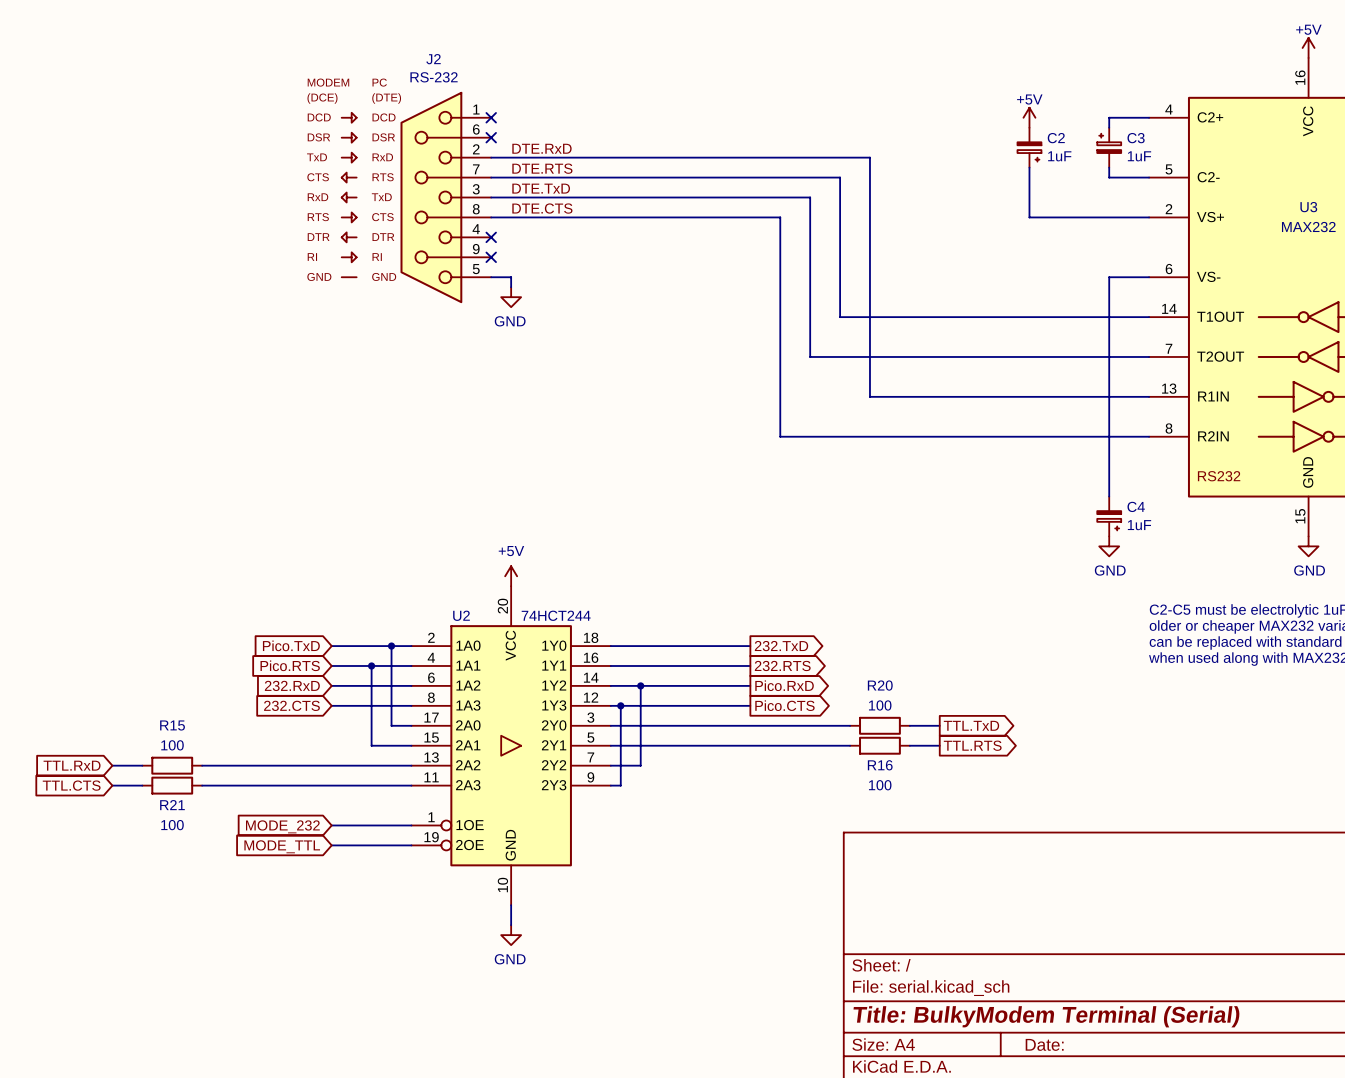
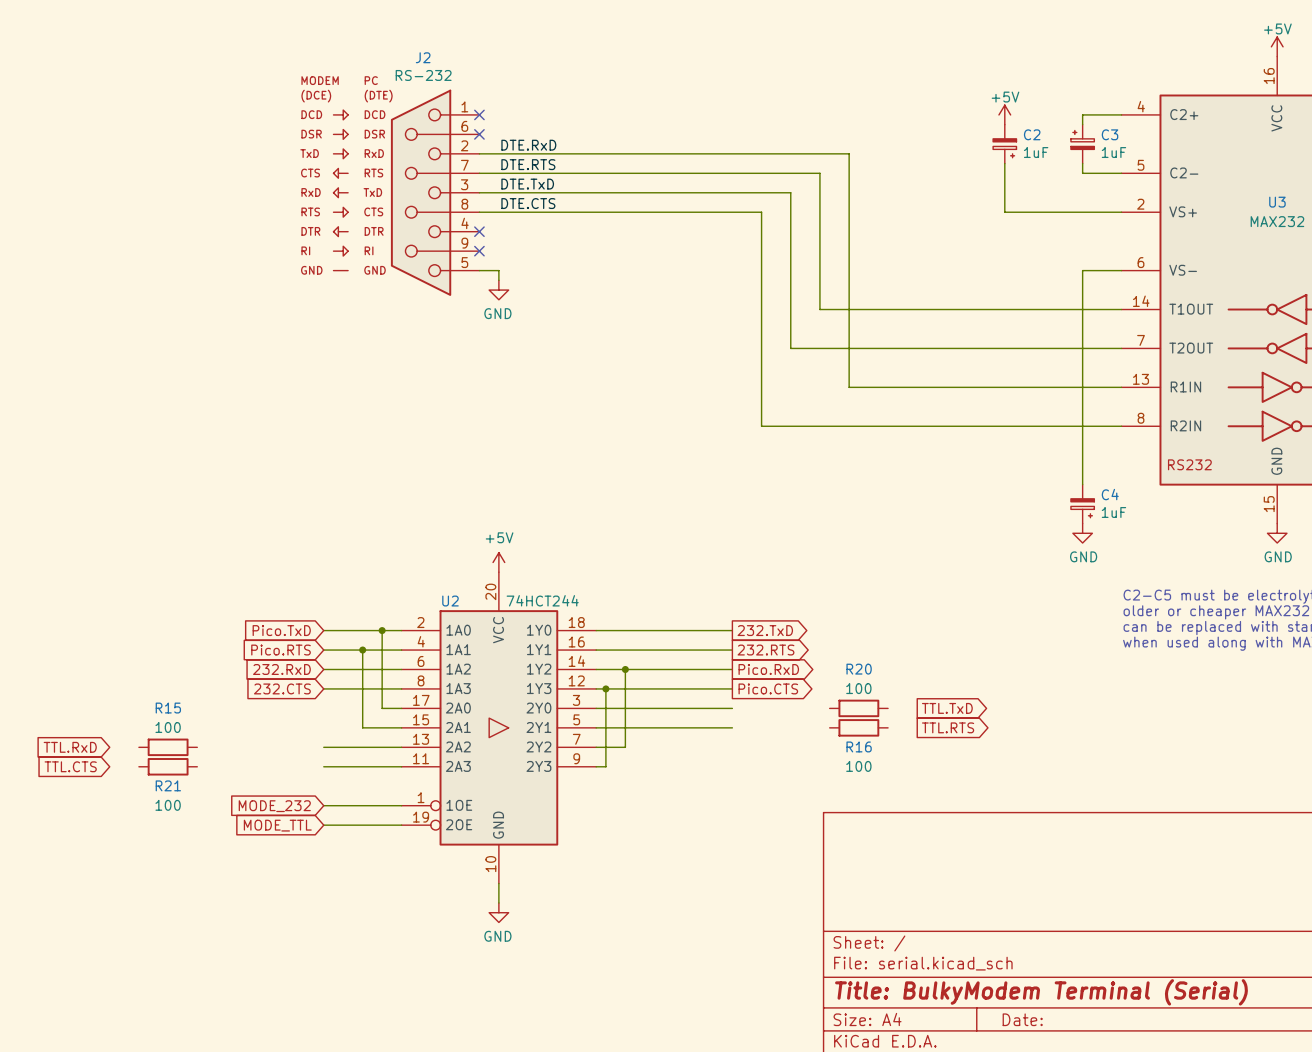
wire: (750, 725) (850, 725) -> none
wire: (909, 725) (939, 725) -> none
wire: (750, 745) (850, 745) -> none
wire: (909, 745) (939, 745) -> none
wire: (112, 765) (142, 765) -> none
wire: (202, 765) (331, 765) -> none
wire: (112, 785) (142, 785) -> none
wire: (202, 785) (331, 785) -> none

